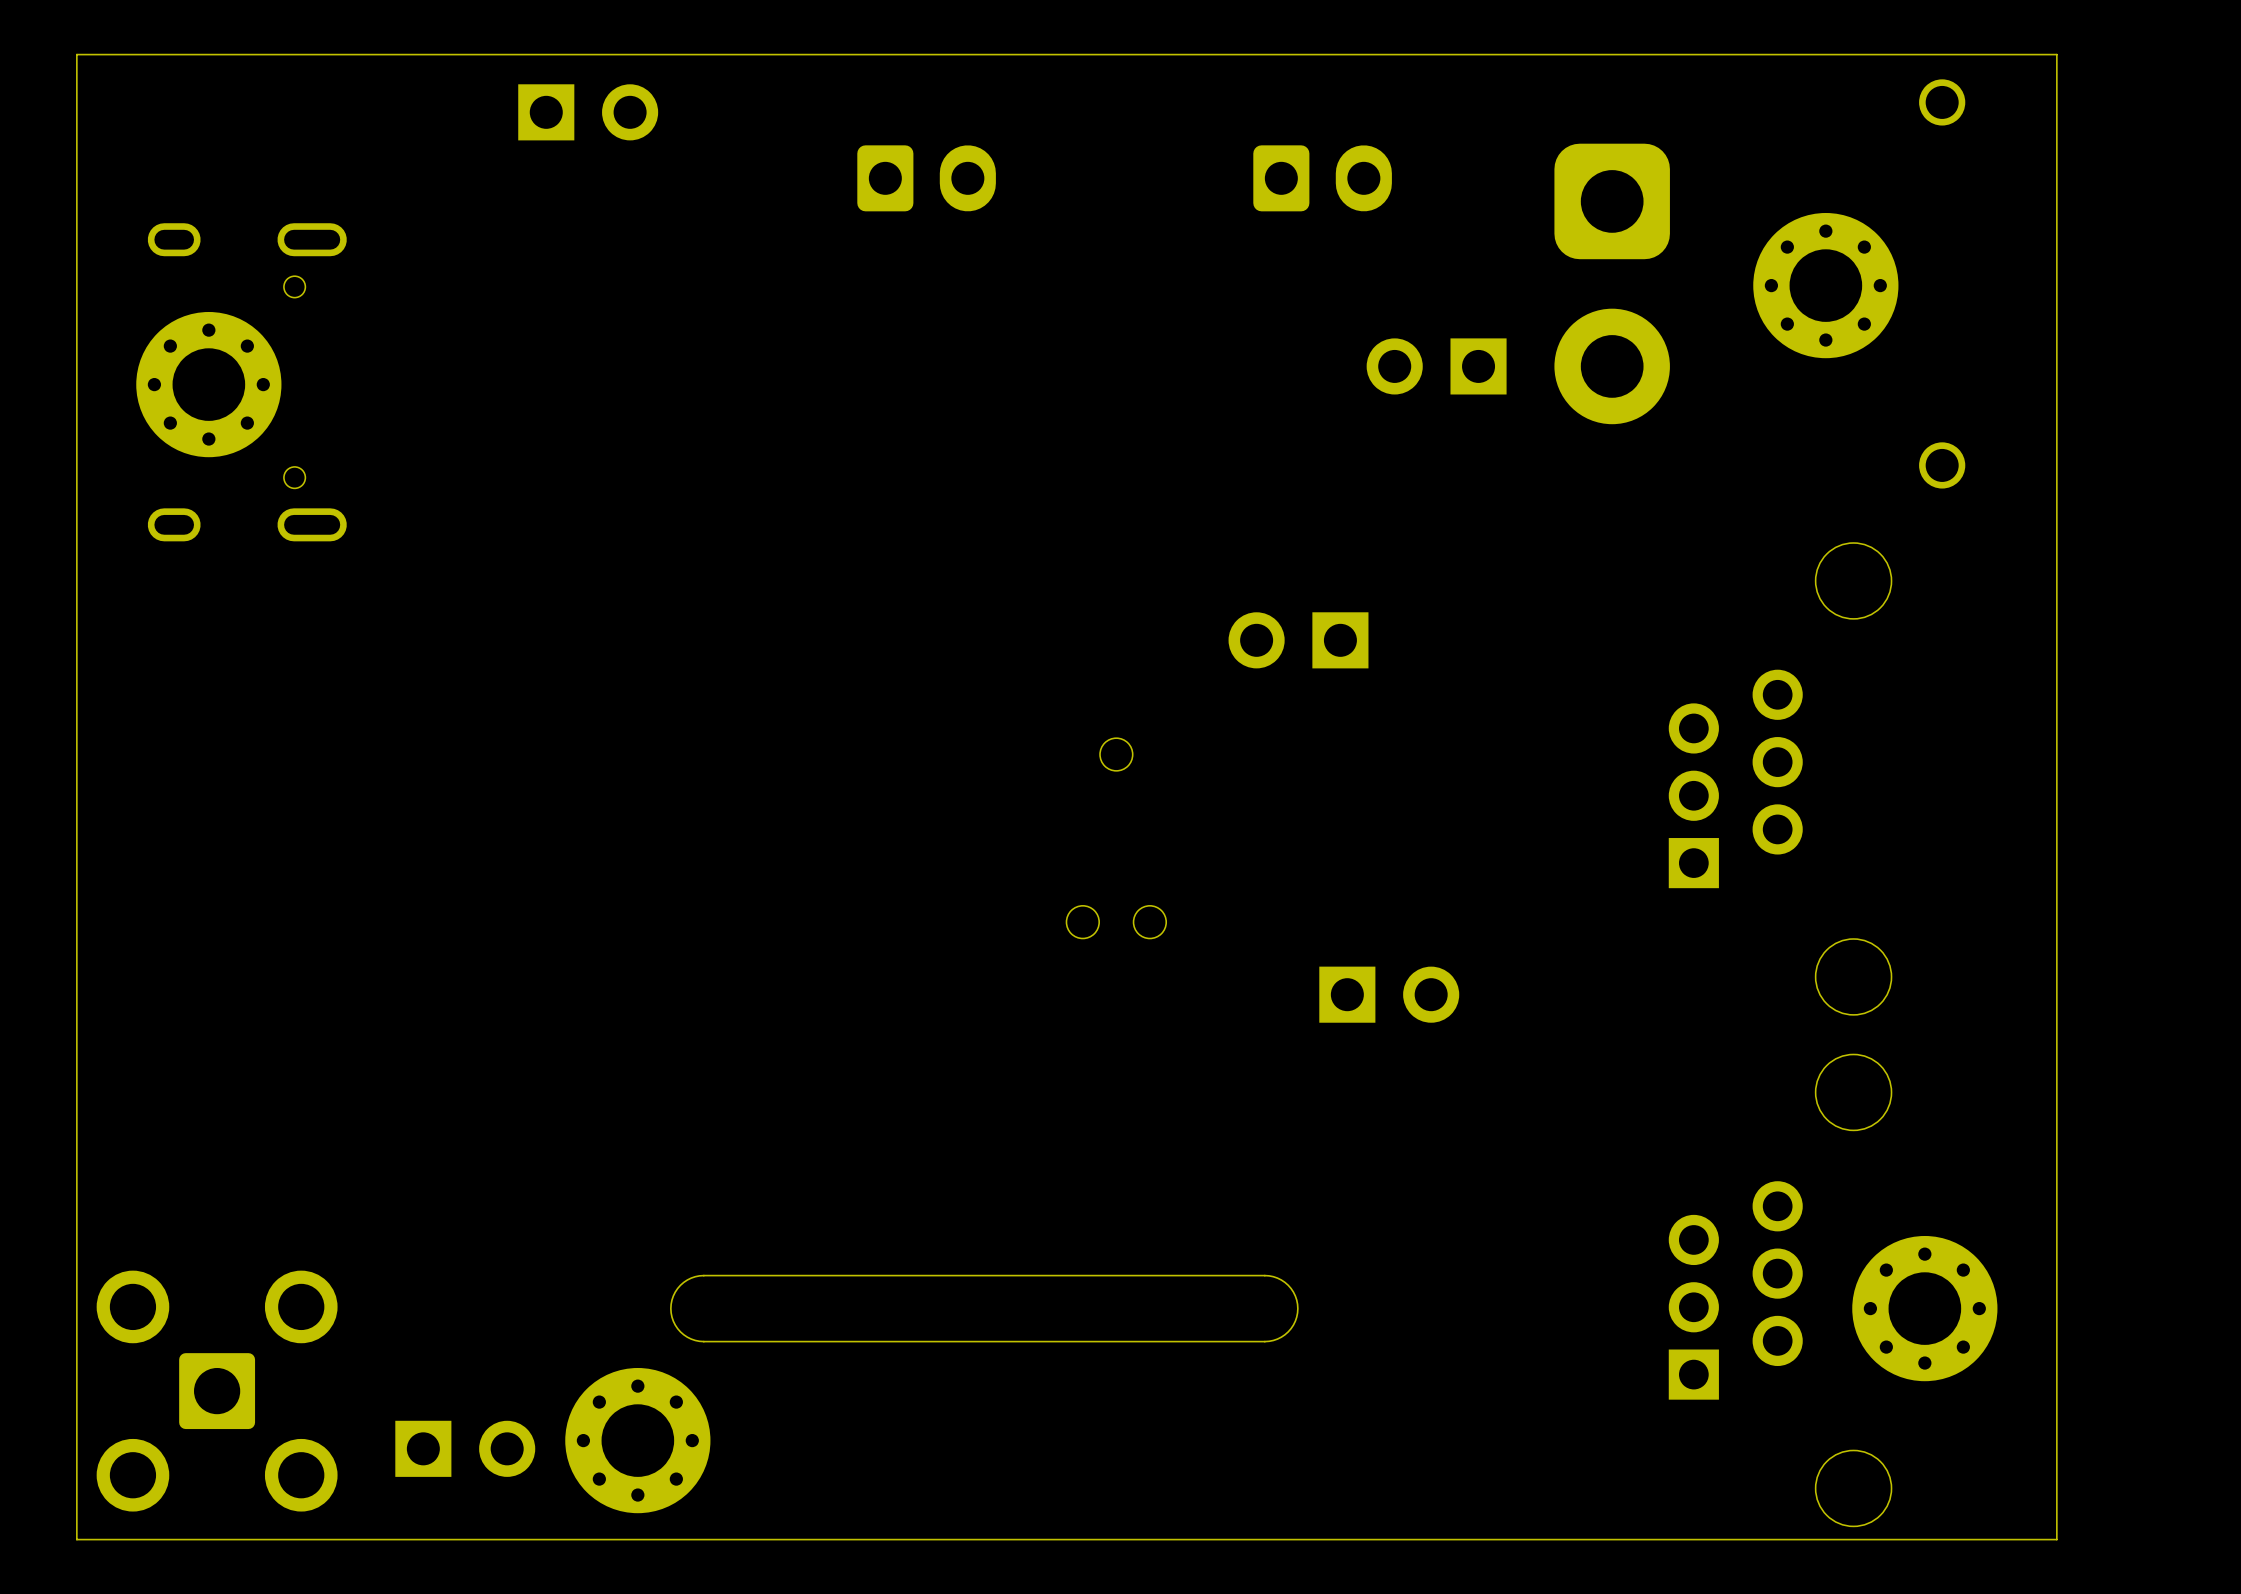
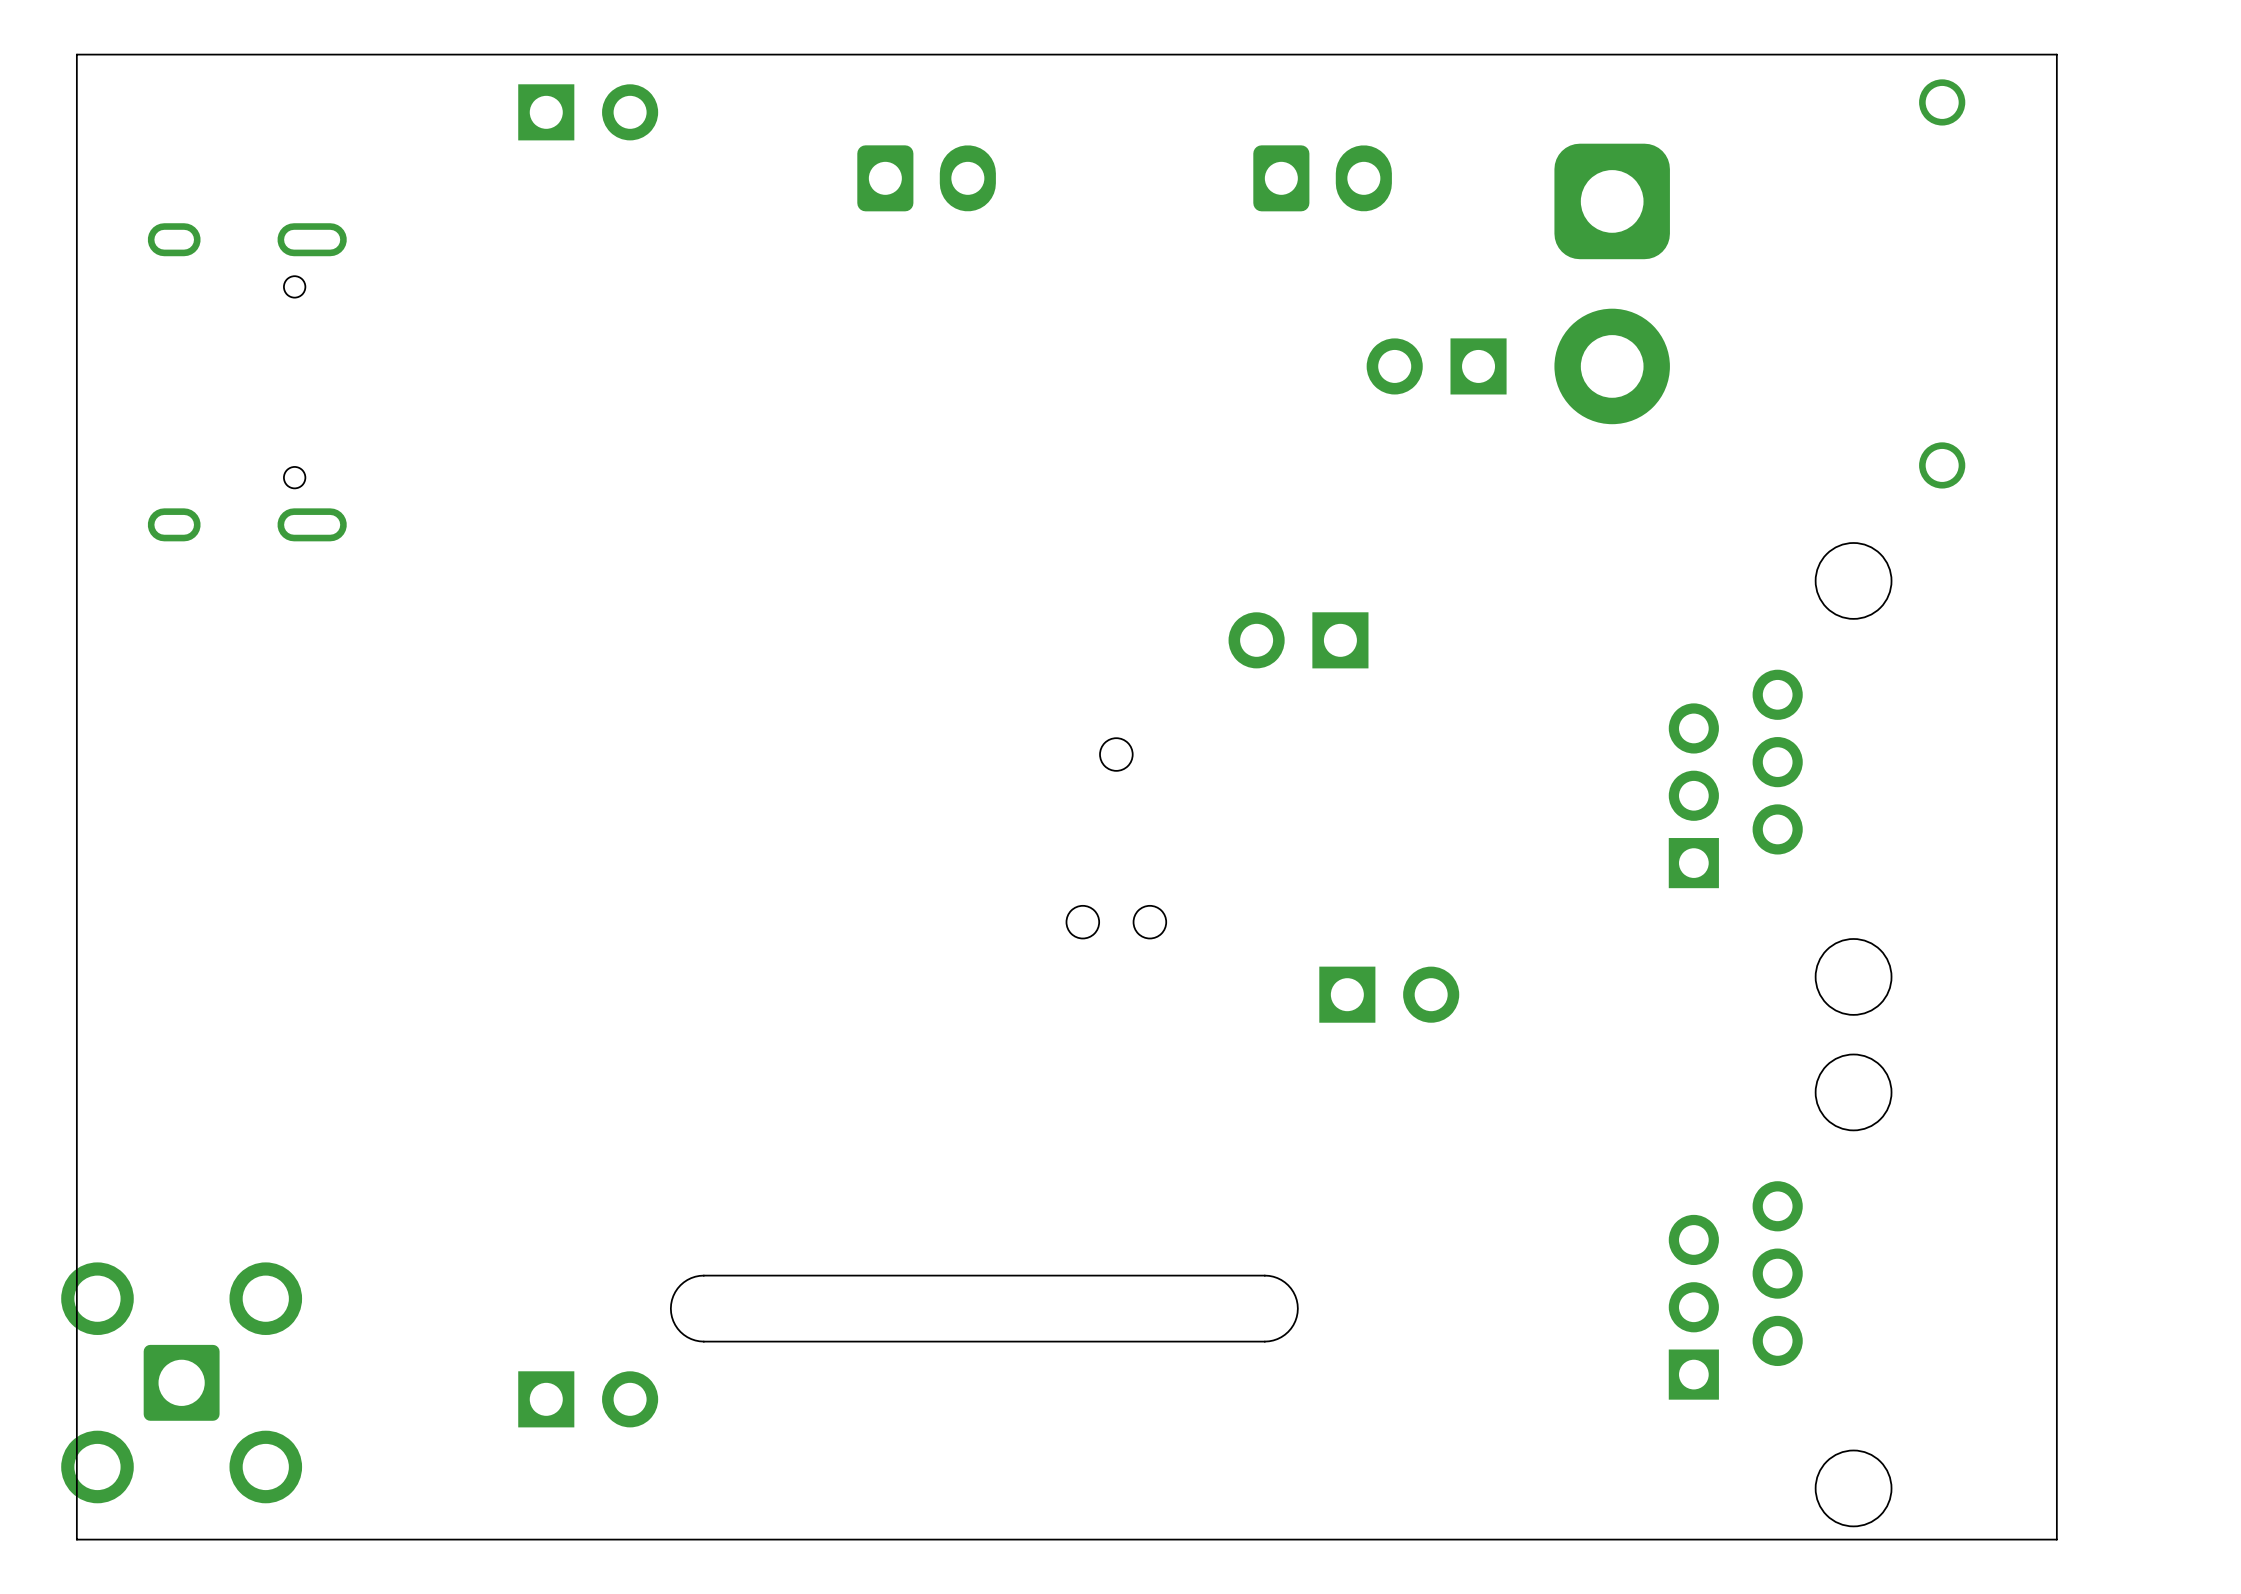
part: (1825, 285) -> none
part: (208, 384) -> none
part: (1924, 1308) -> none
part position: (217, 1391) -> (181, 1382)
part: (637, 1440) -> none
part position: (465, 1448) -> (588, 1399)

